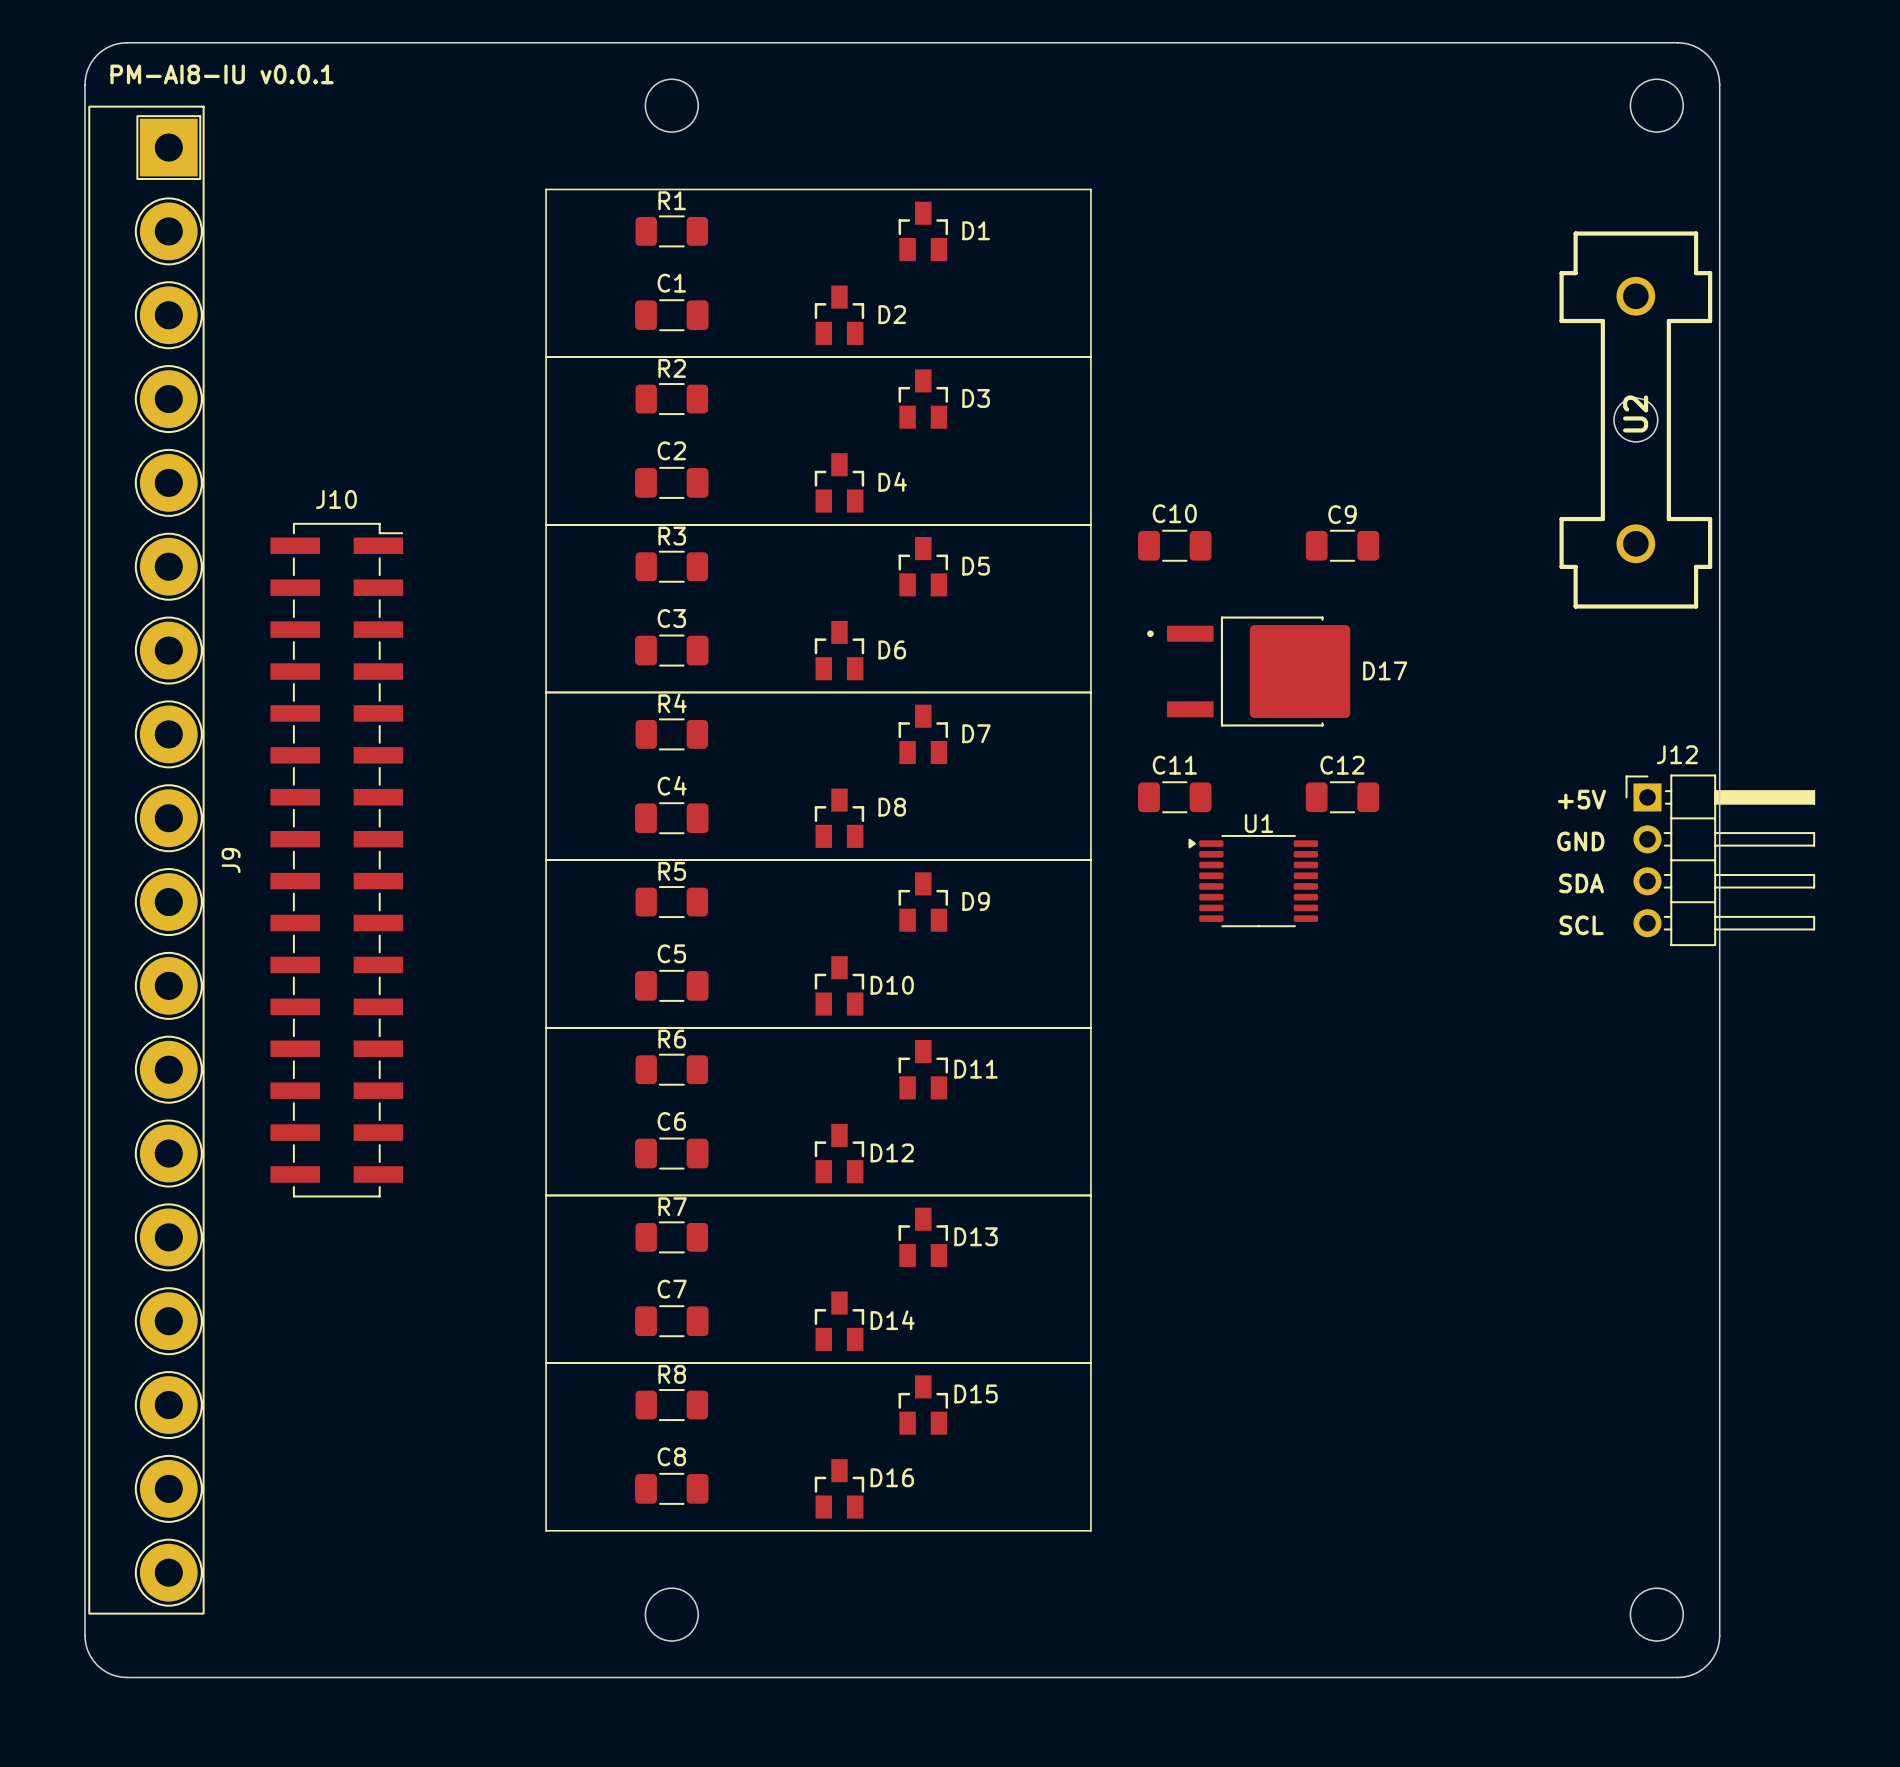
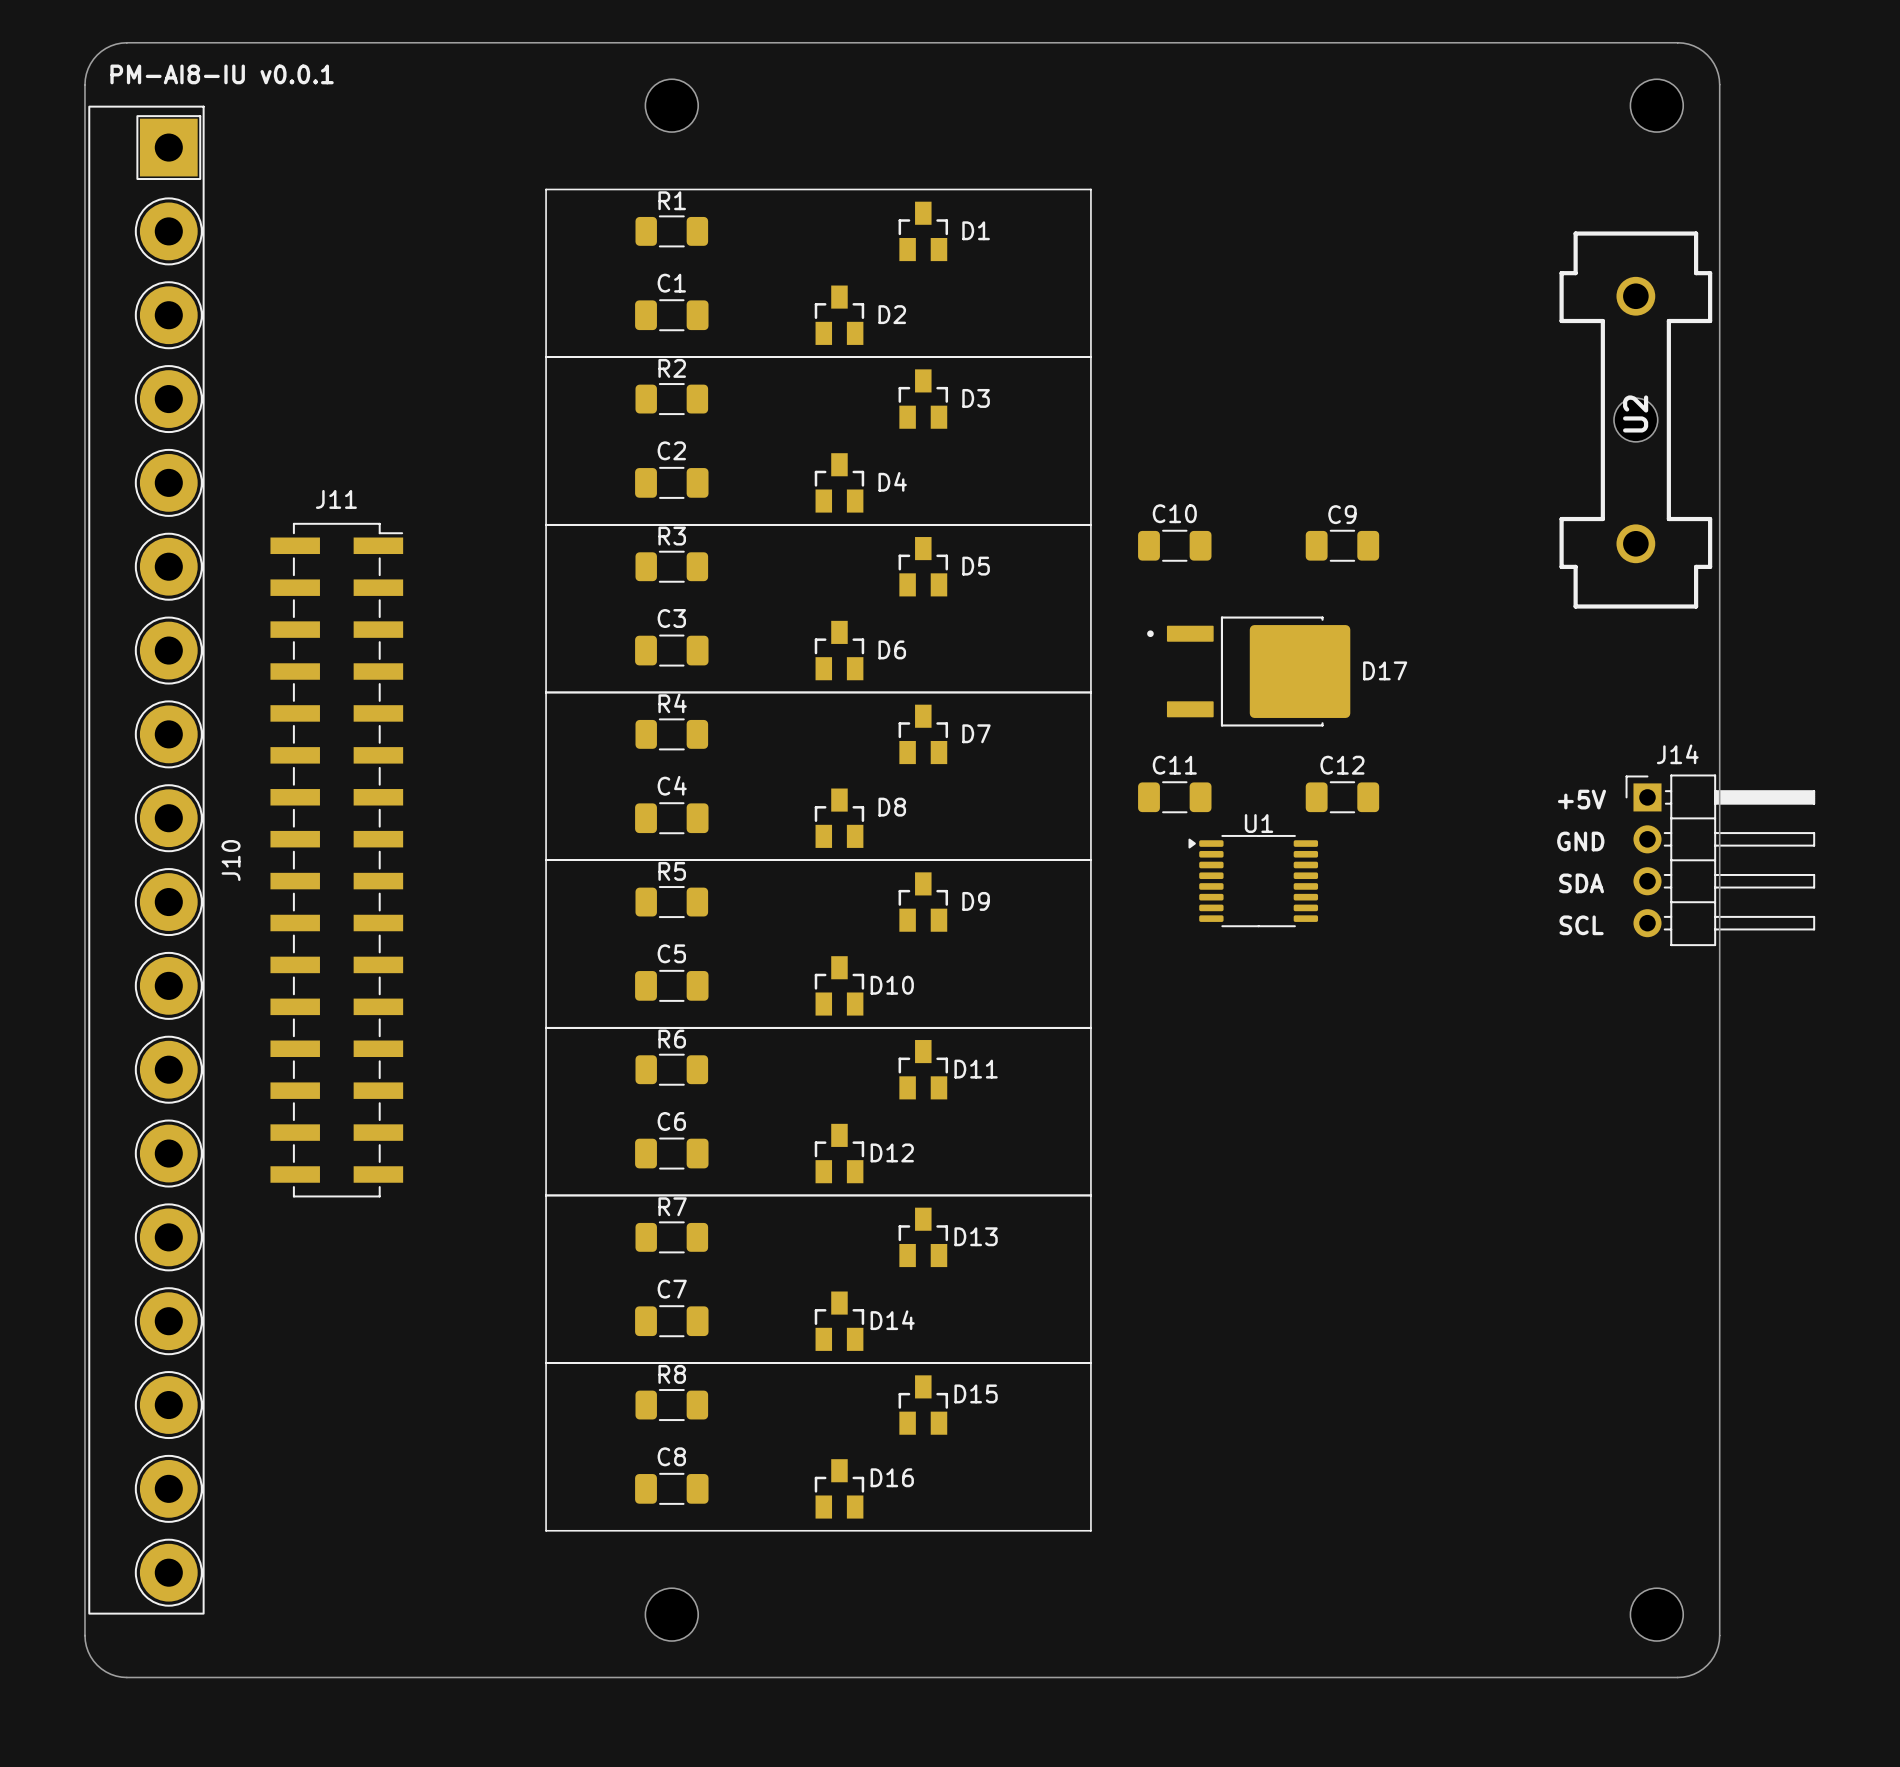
J10 name: J10 (336, 499) -> J11 (336, 499)
J12 name: J12 (1677, 754) -> J14 (1677, 754)
J9 name: J9 (231, 860) -> J10 (231, 860)

